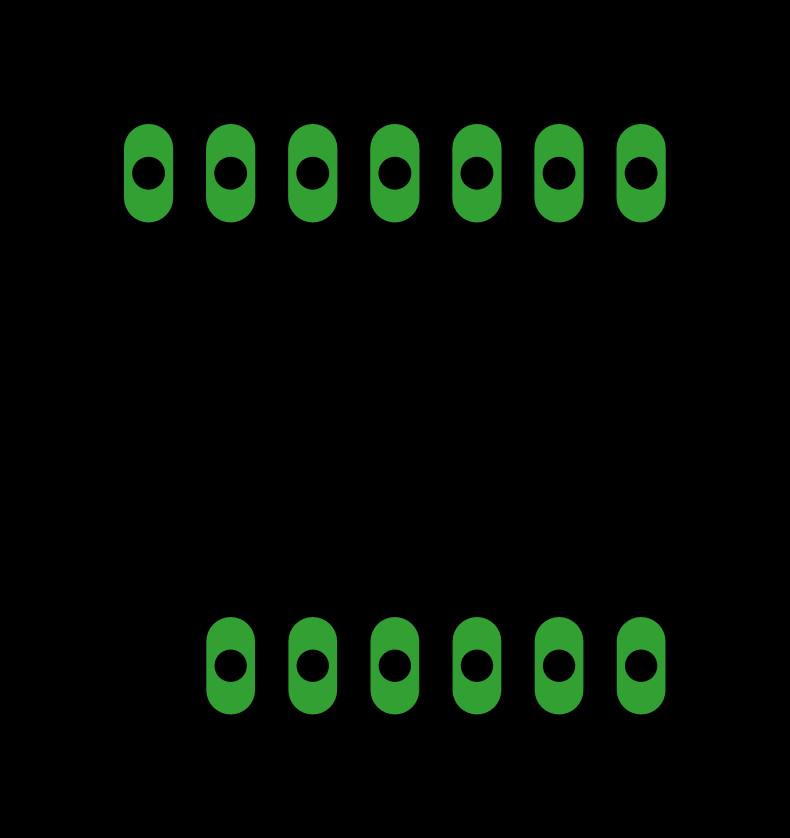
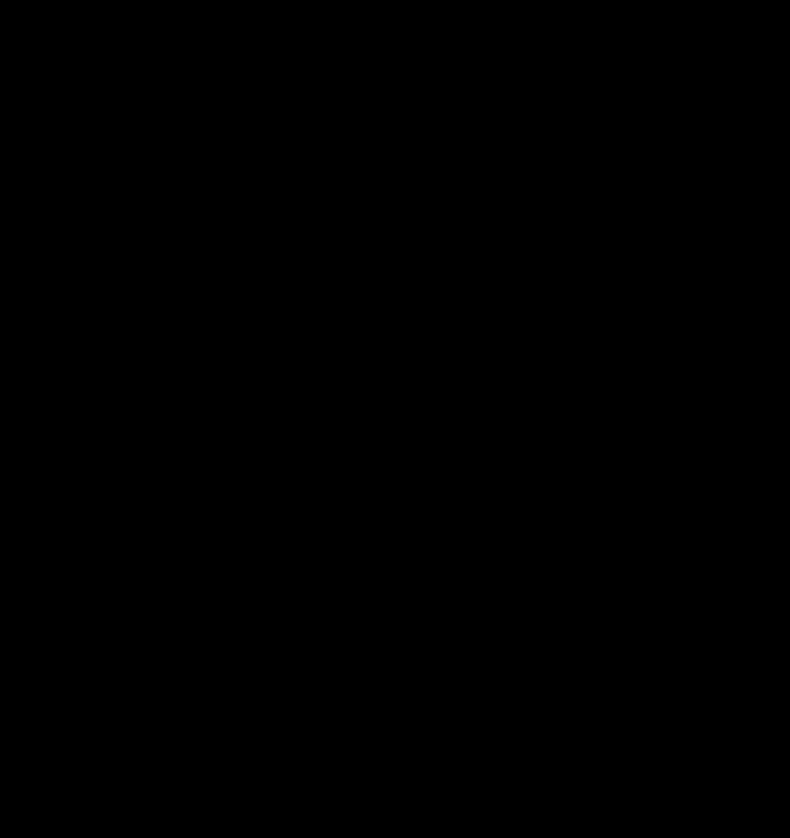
part: (394, 173) -> none
part: (435, 665) -> none

